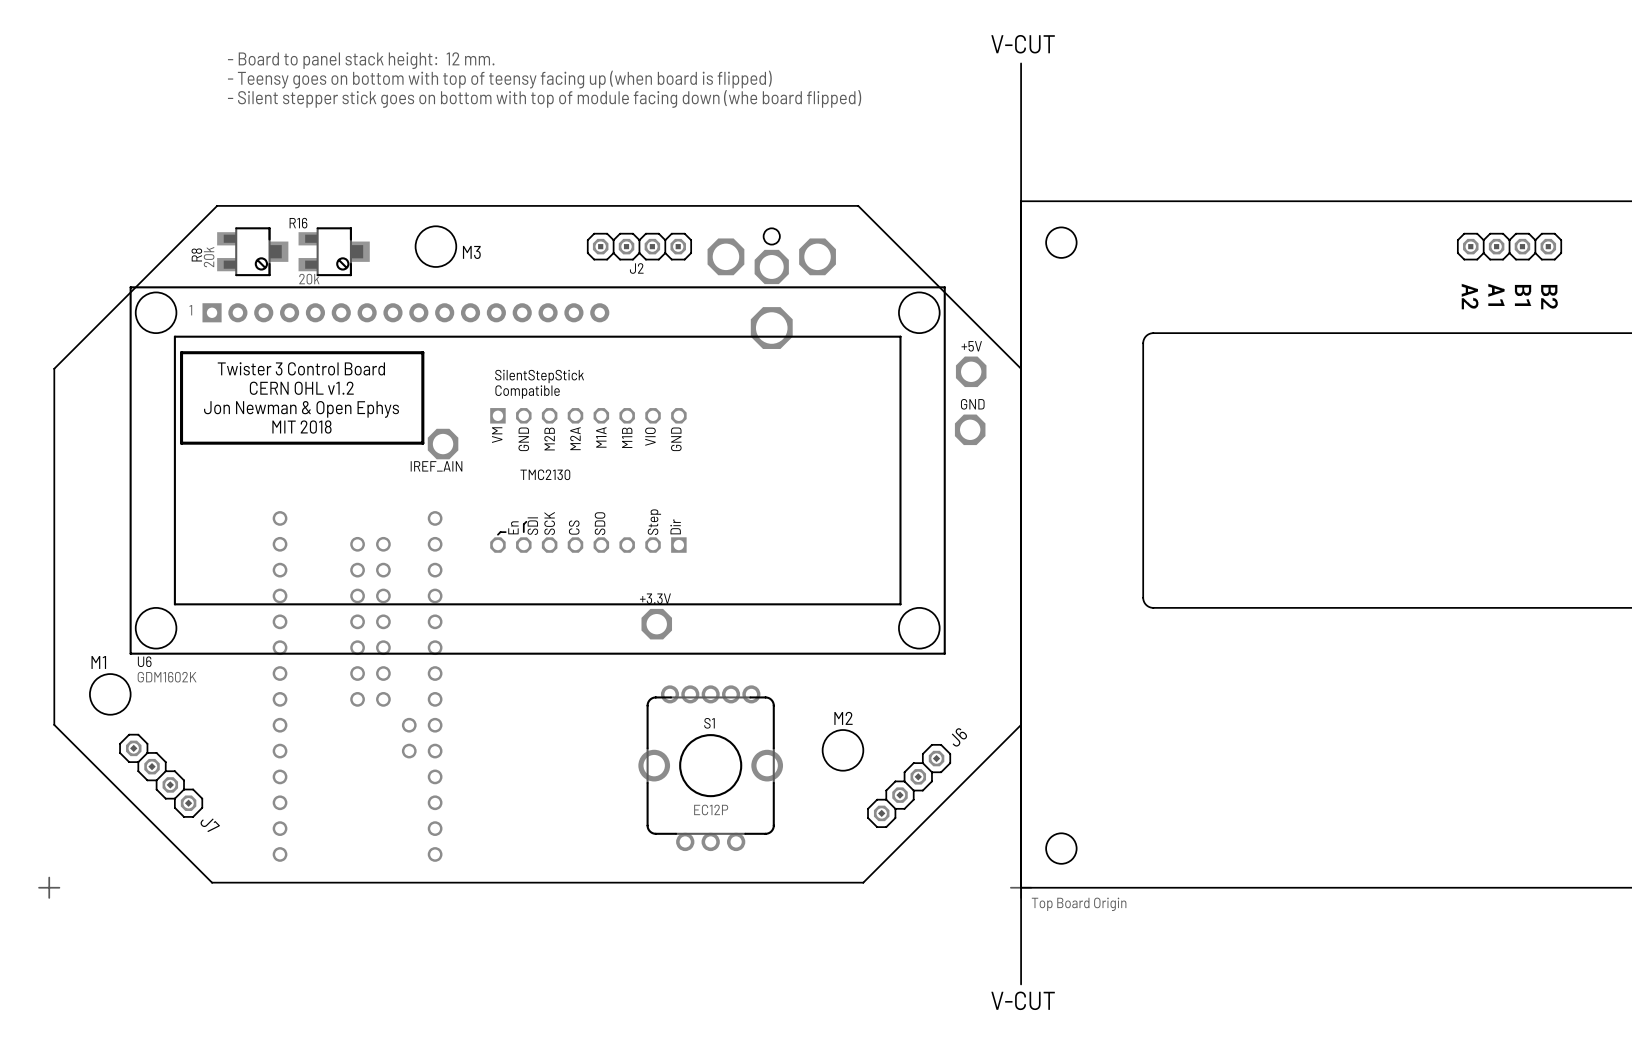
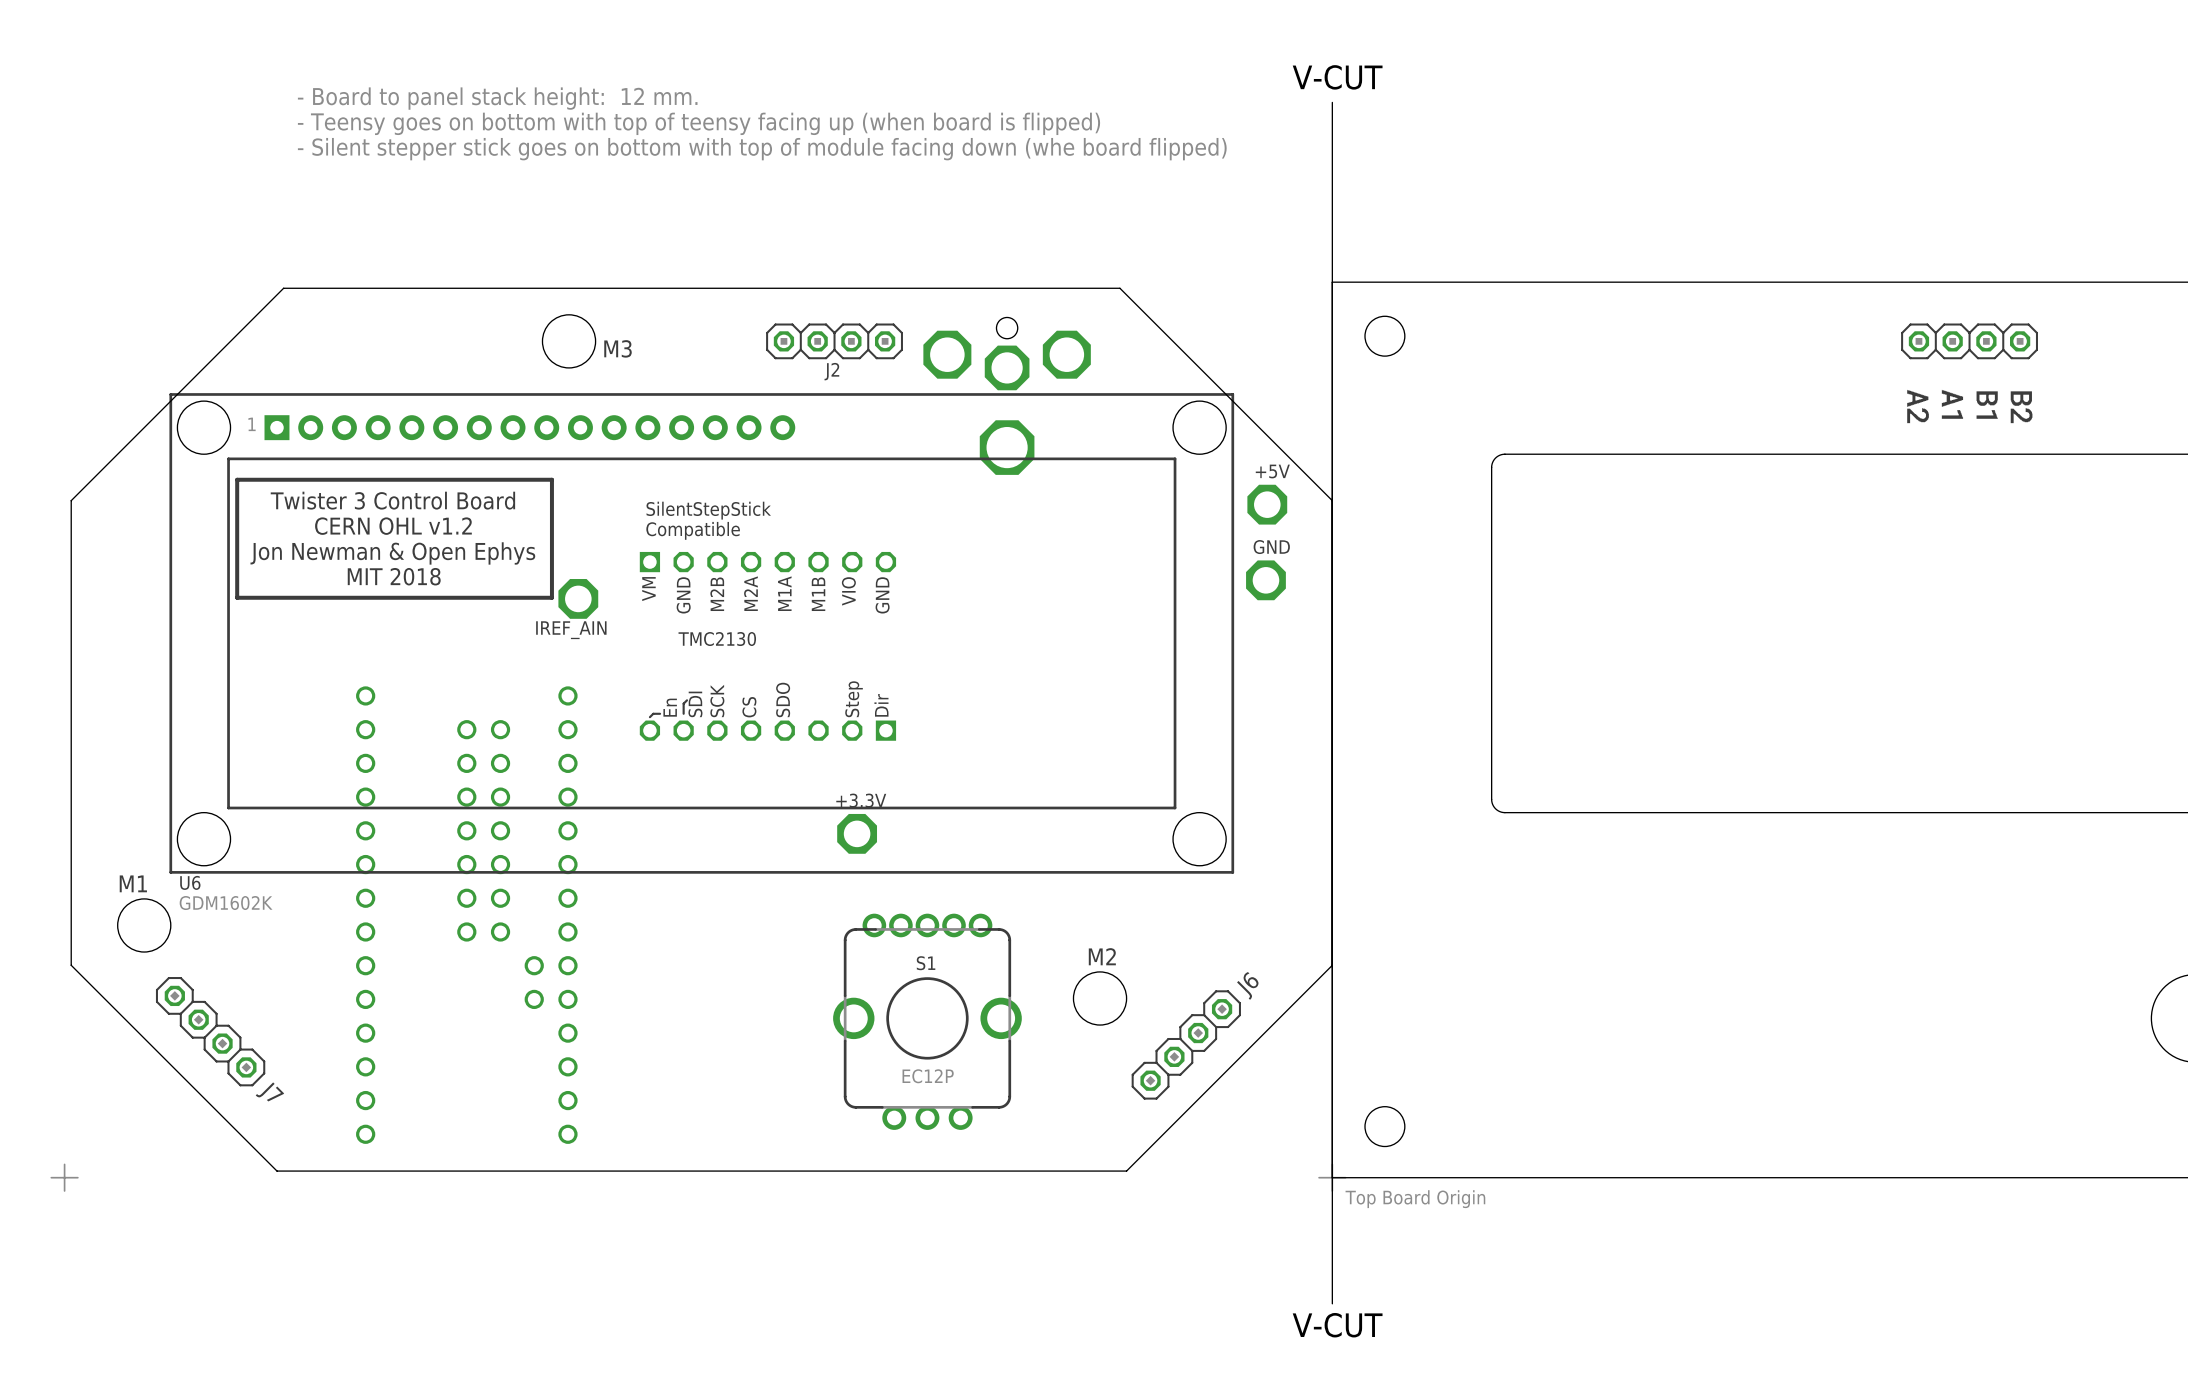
R8: 20k (252, 251) -> none
R16: 20k (334, 251) -> none

